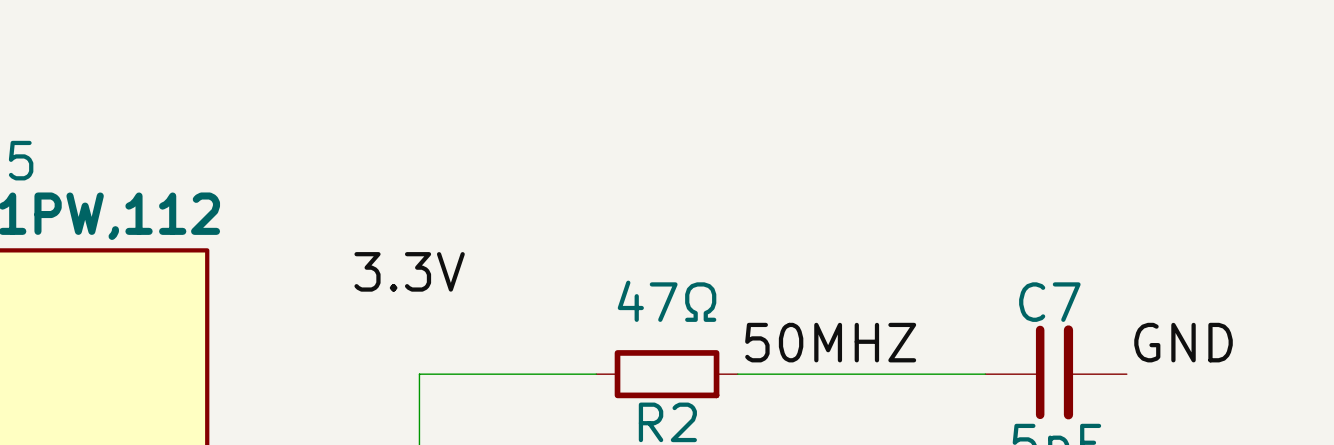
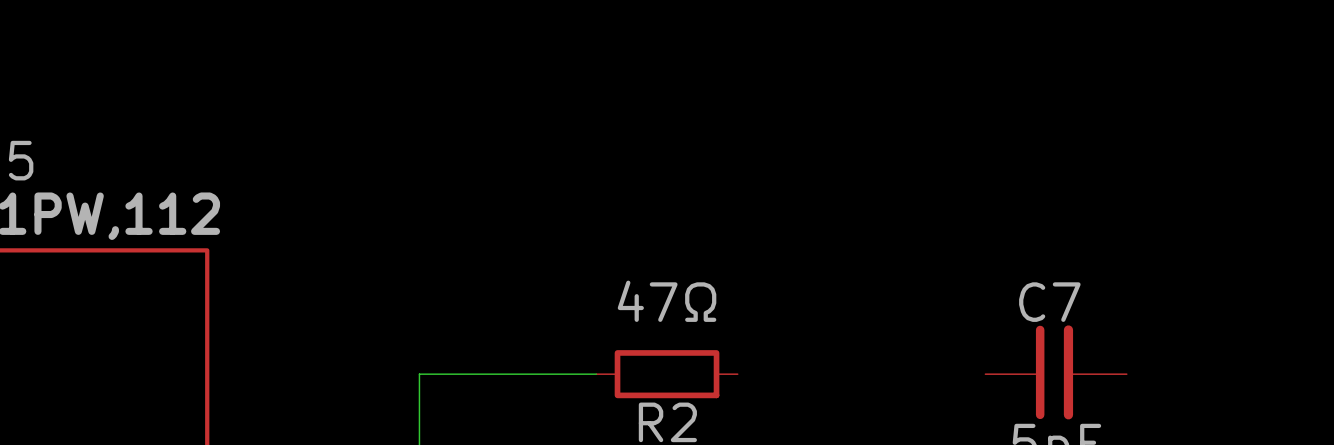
label: 3.3V (409, 271) -> none
label: 50MHZ (830, 342) -> none
label: GND (1183, 342) -> none
wire: (737, 374) (985, 374) -> none

